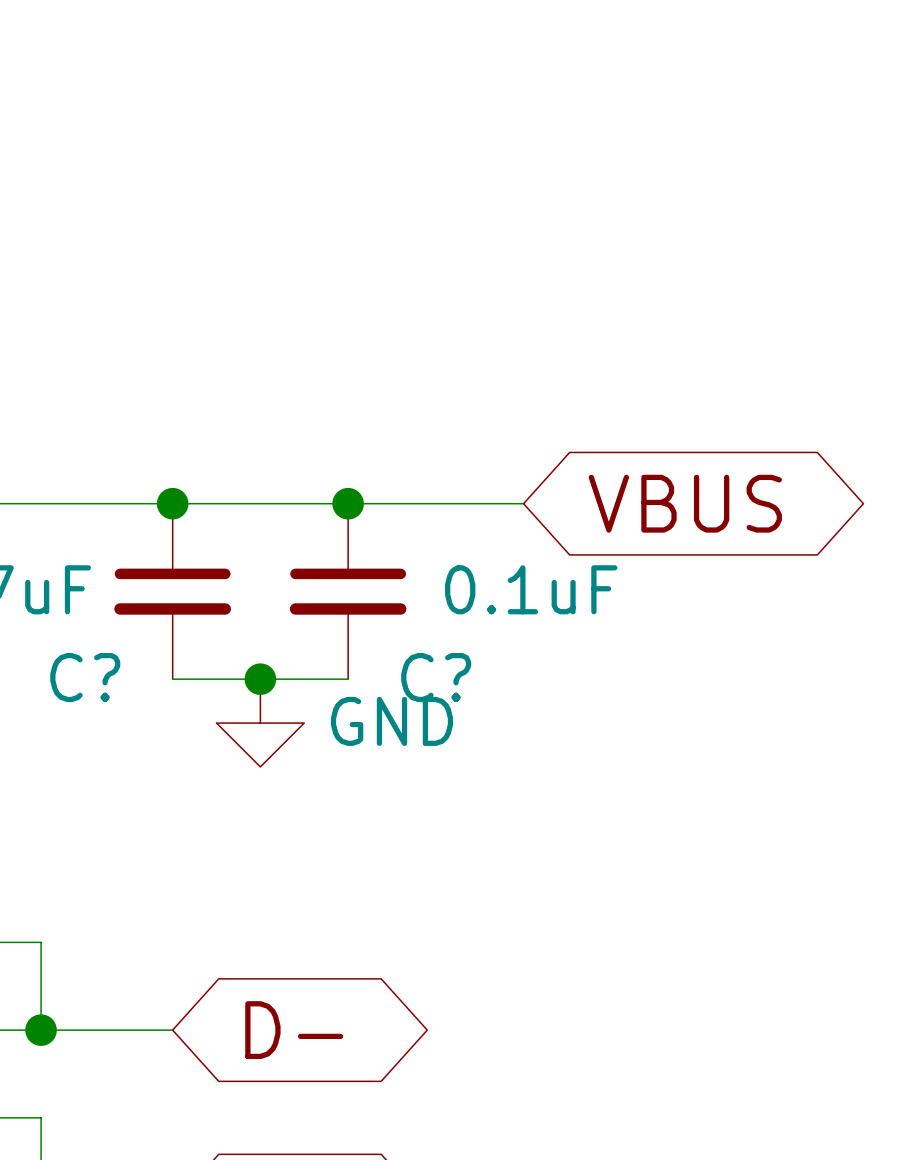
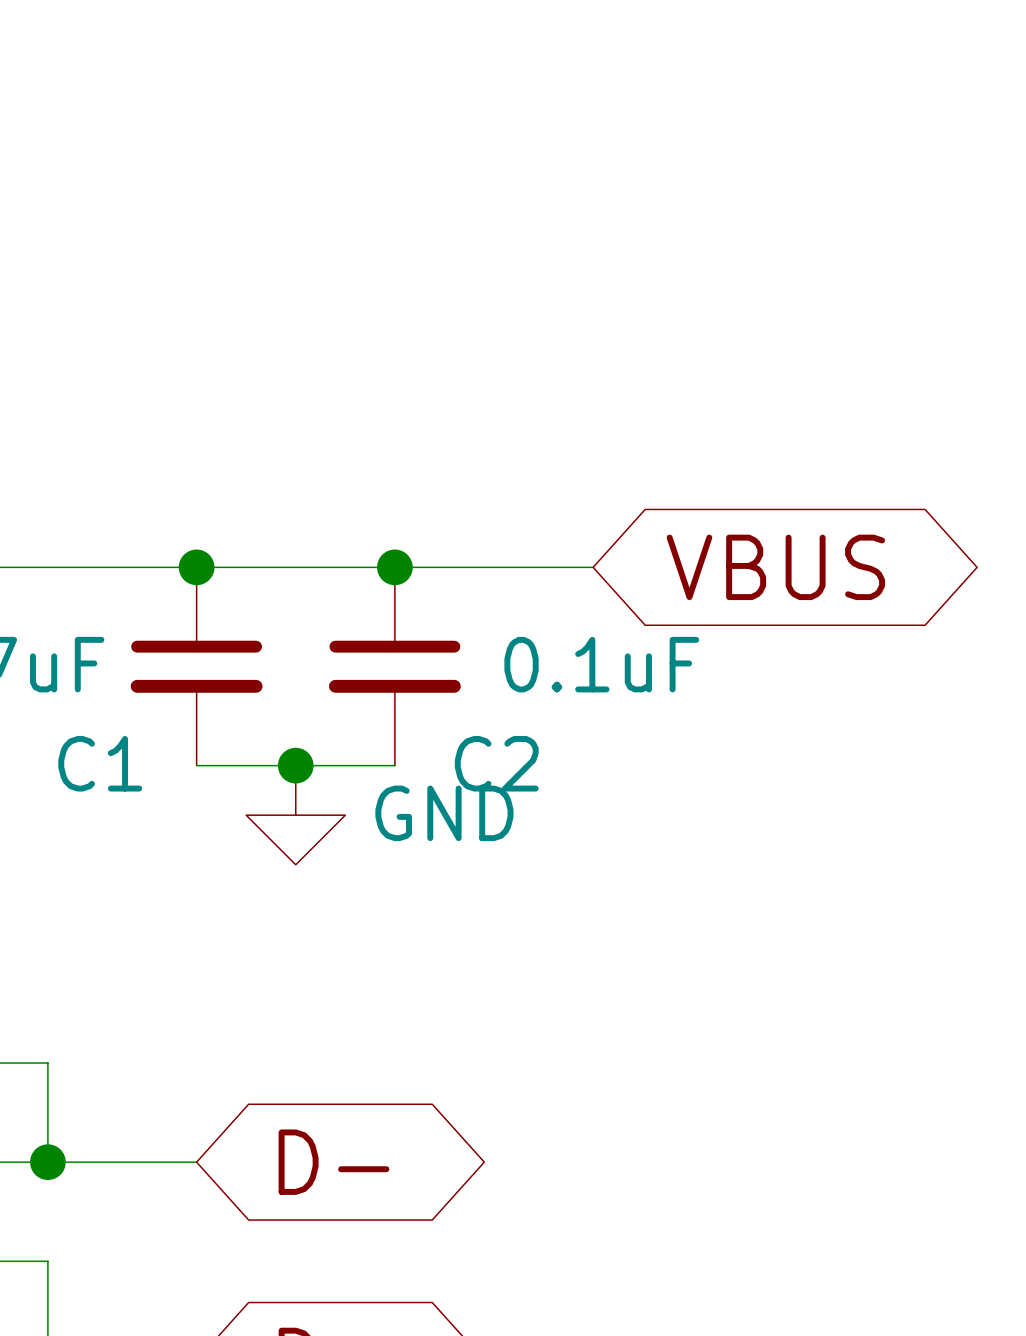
C? name: C? (85, 677) -> C1 (100, 763)
C? name: C? (436, 677) -> C2 (496, 763)

